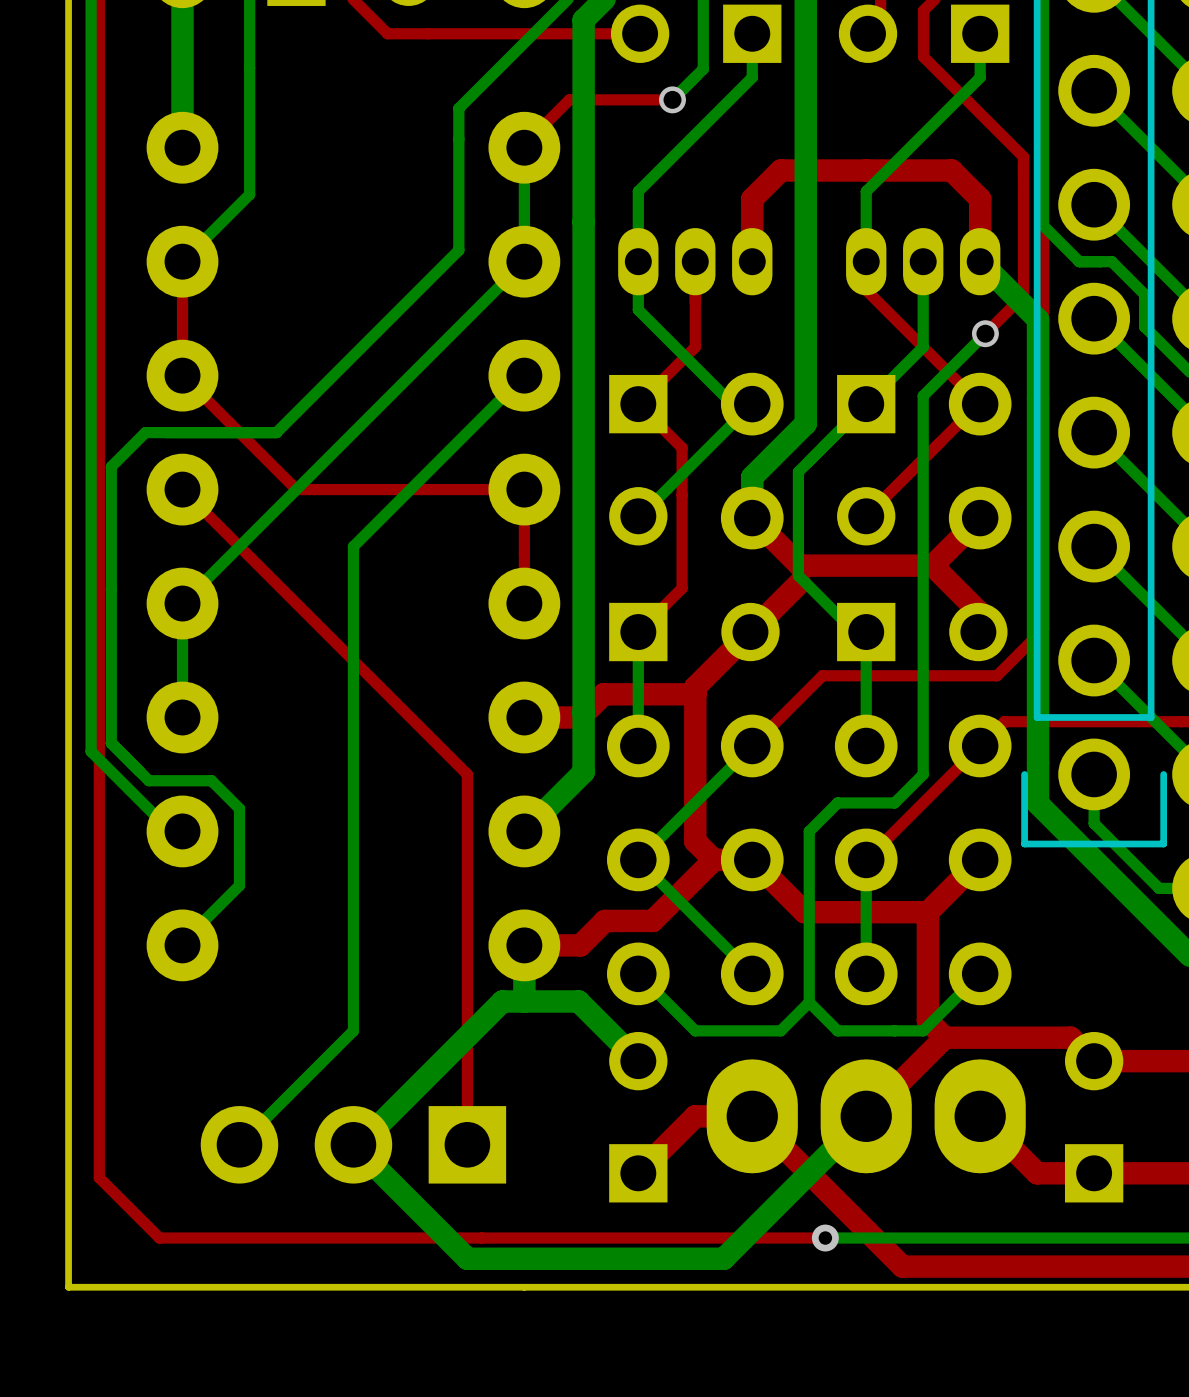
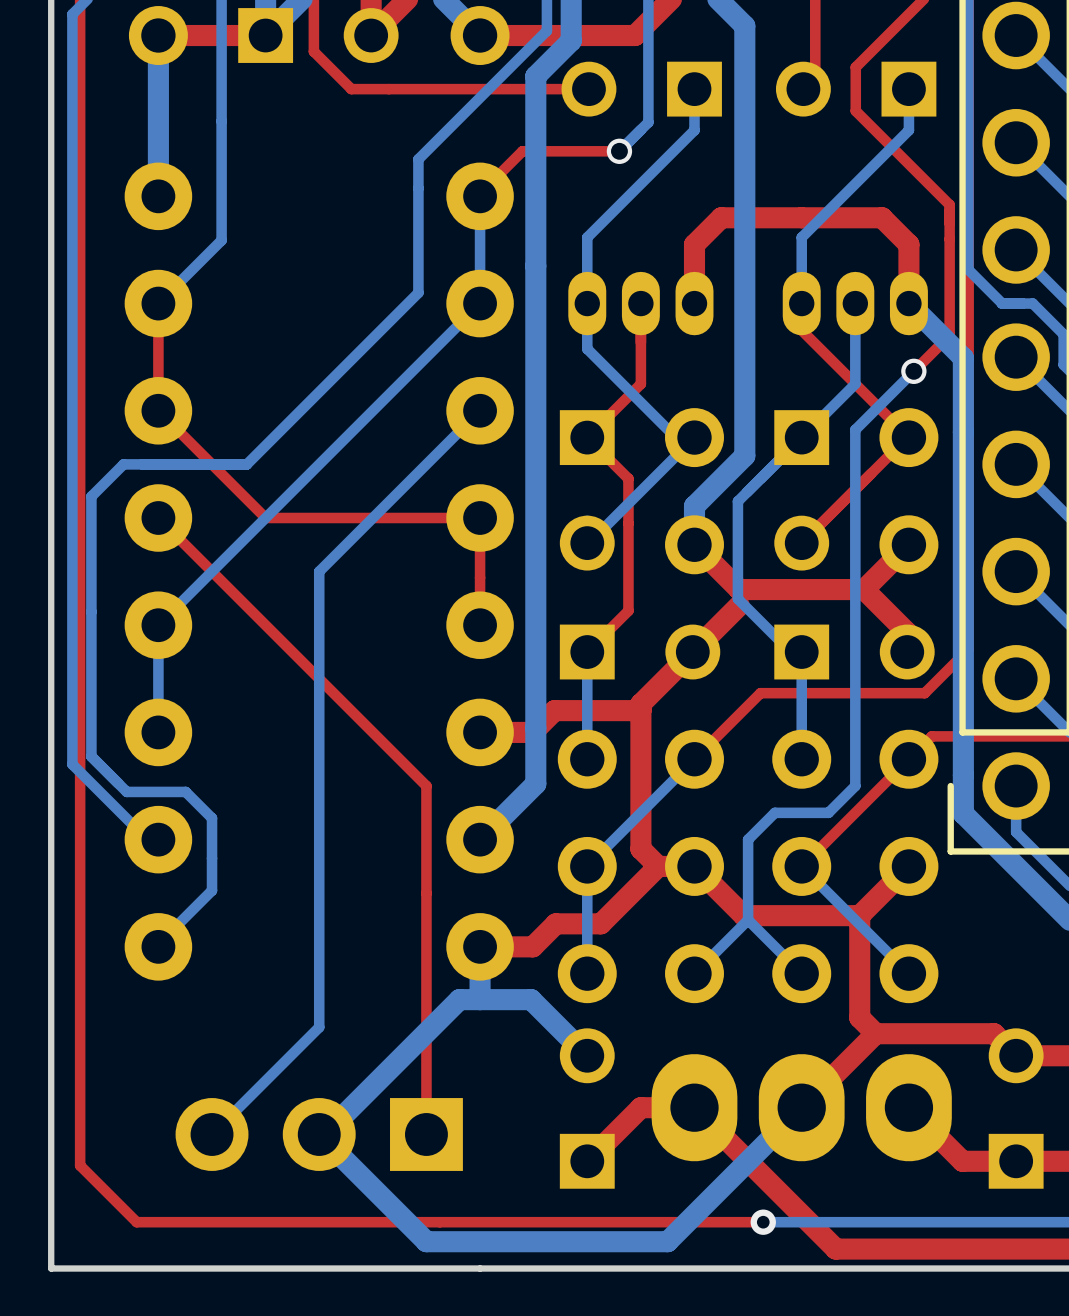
bottom track: (638, 859) (752, 973) -> (587, 866) (587, 973)
bottom track: (866, 859) (866, 973) -> (801, 866) (908, 973)
bottom track: (809, 916) (809, 1002) -> none
bottom track: (638, 973) (695, 1030) (780, 1030) (809, 1002) -> none
bottom track: none -> (801, 973) (748, 920) (694, 973)
bottom track: (980, 973) (923, 1030) (837, 1030) (809, 1002) -> none

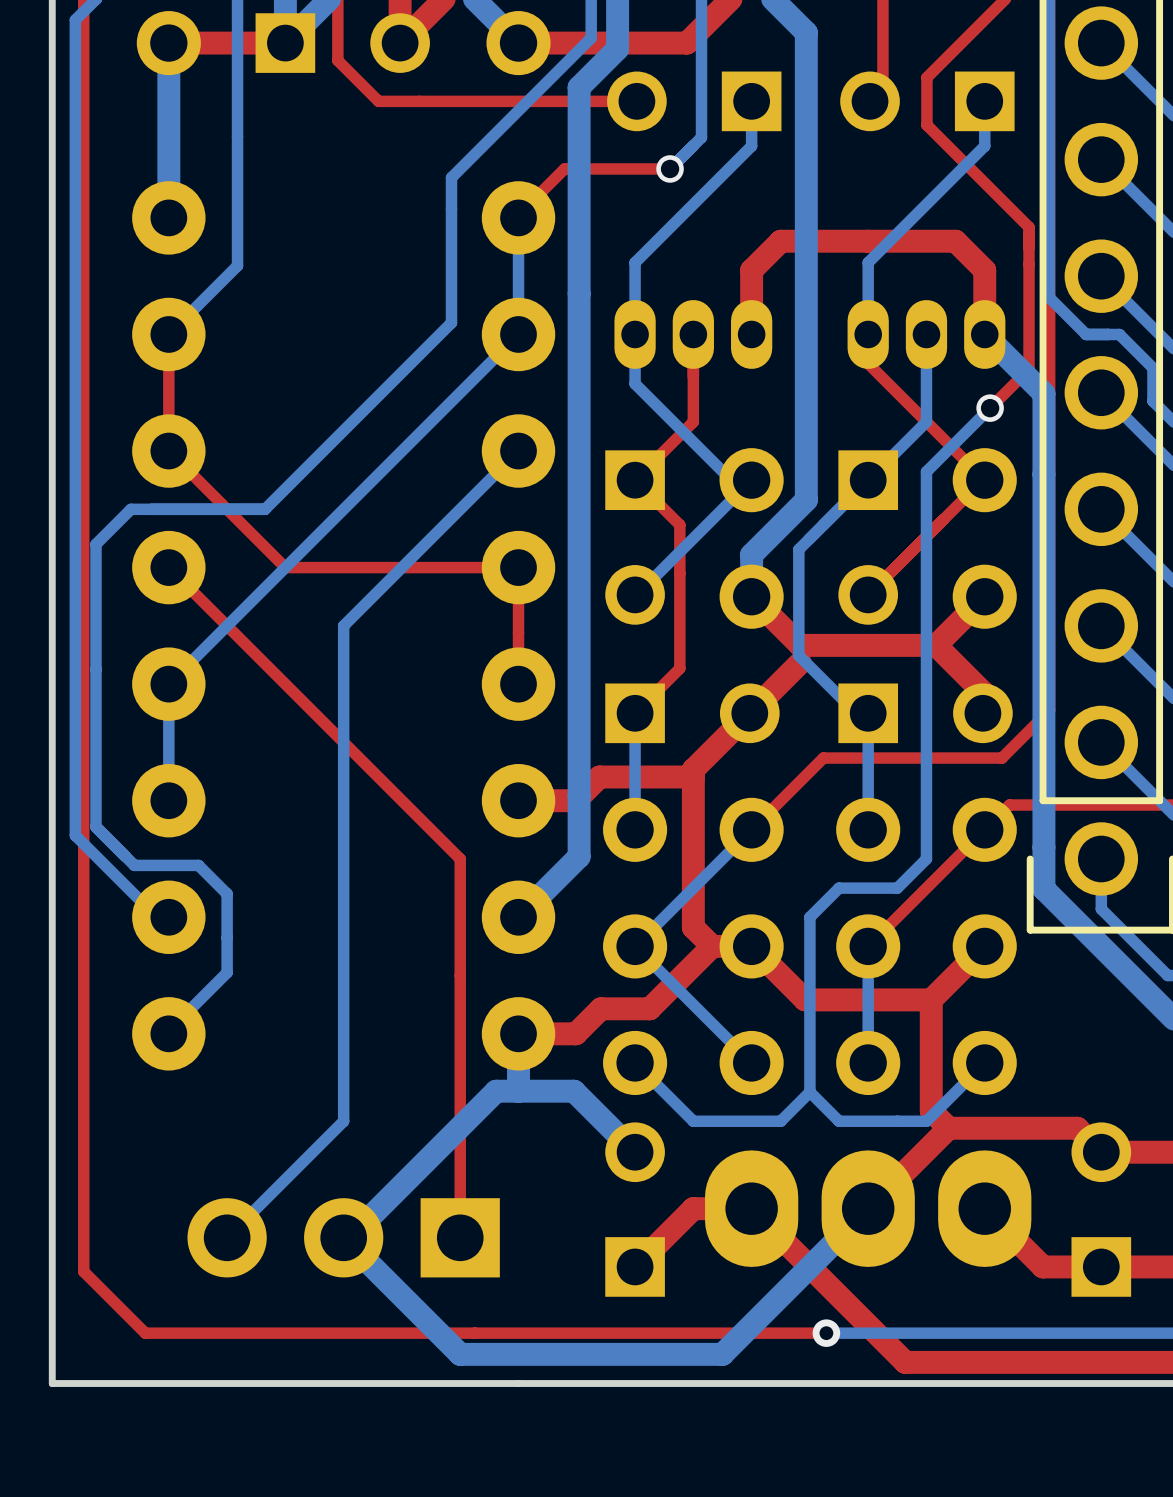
bottom track: (587, 866) (587, 973) -> (635, 946) (751, 1062)
bottom track: (801, 866) (908, 973) -> (868, 946) (868, 1062)
bottom track: none -> (809, 1004) (809, 1092)
bottom track: none -> (635, 1062) (693, 1121) (780, 1121) (809, 1092)
bottom track: (801, 973) (748, 920) (694, 973) -> none
bottom track: none -> (984, 1062) (926, 1121) (839, 1121) (809, 1092)

